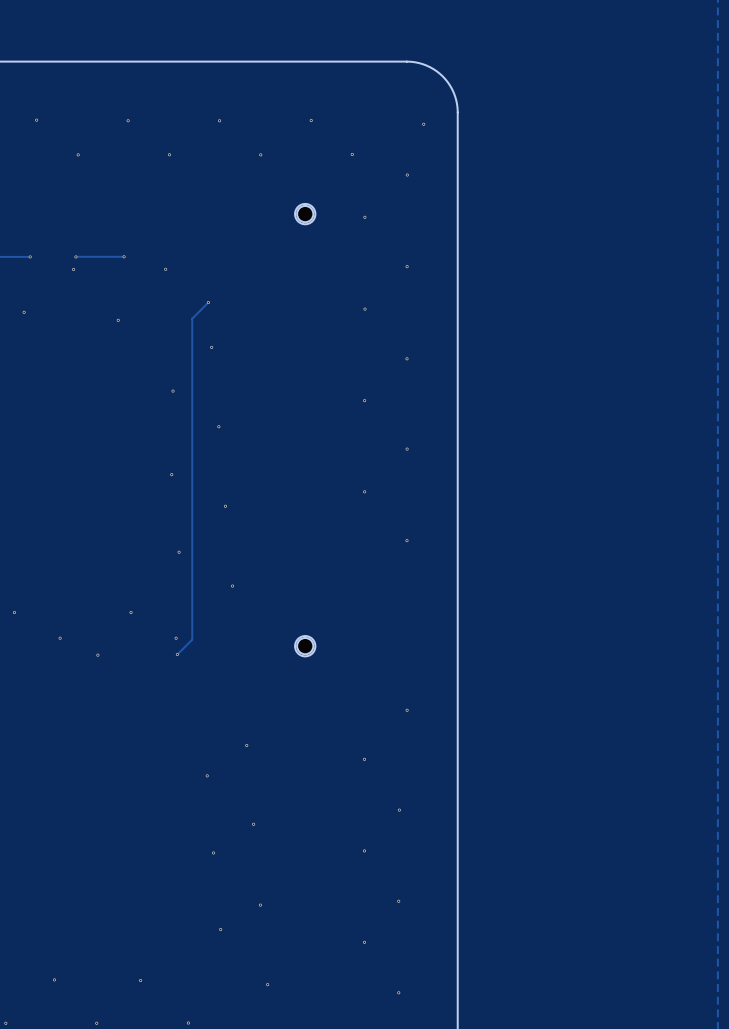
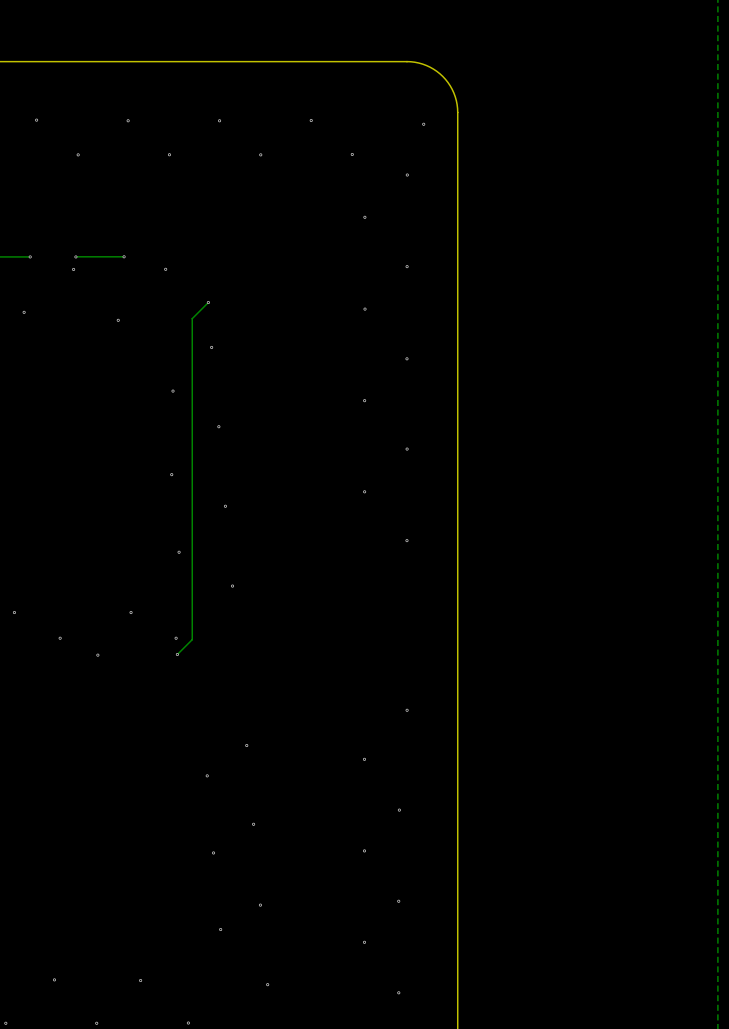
round board edge: [294, 203, 316, 225] -> none
part: (305, 214) -> none
round board edge: [294, 635, 316, 657] -> none
part: (305, 646) -> none

